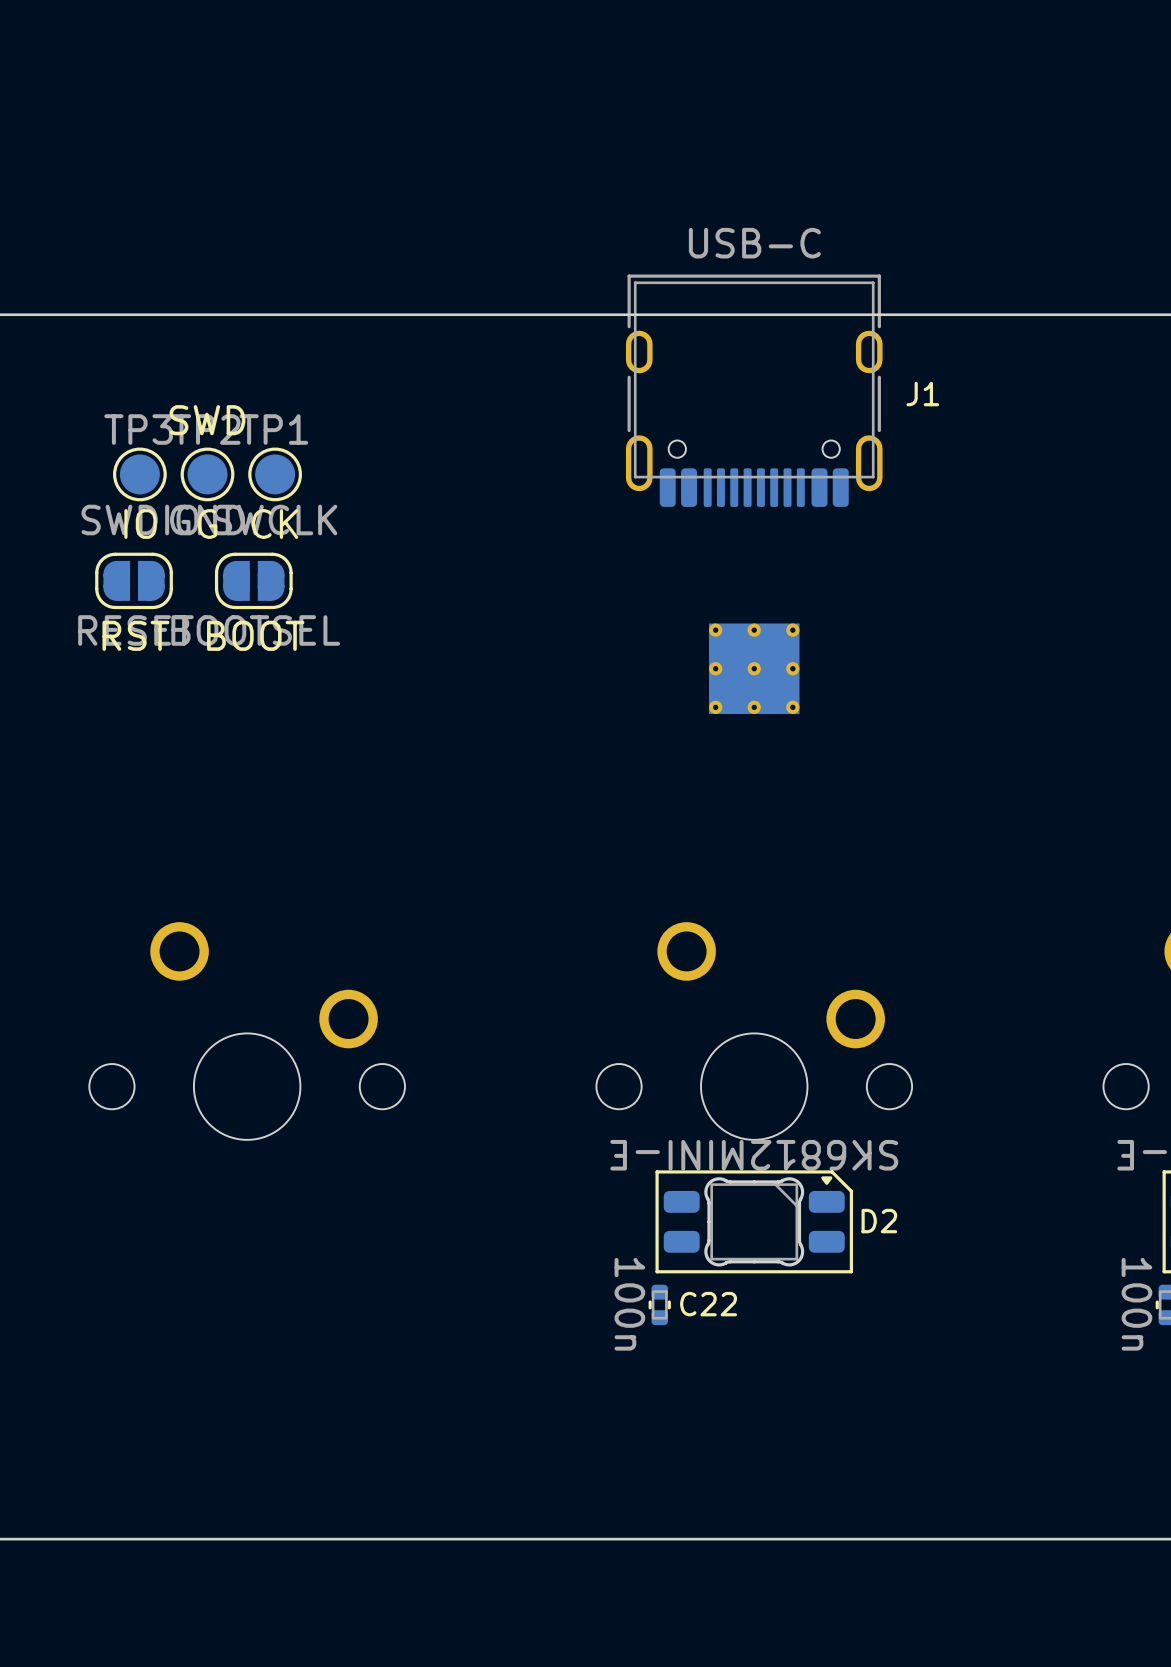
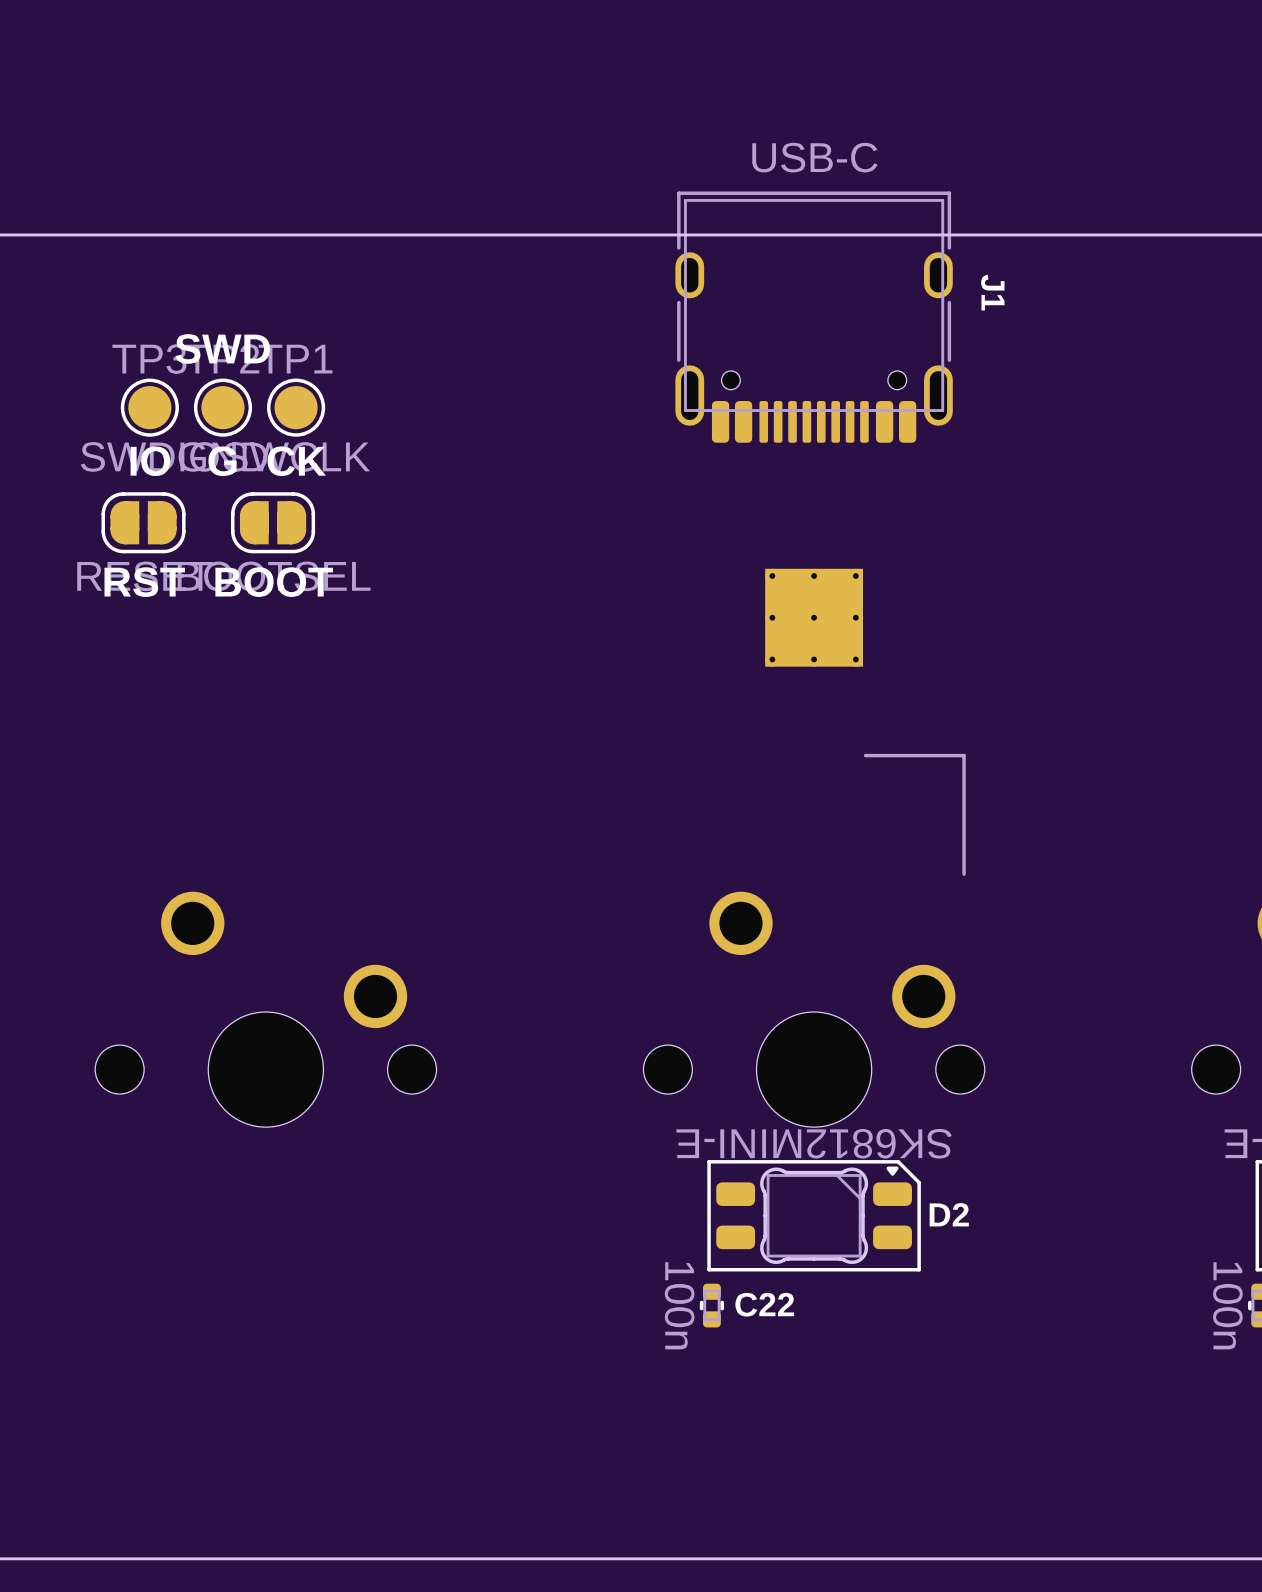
J1 name rotation: 0° (922, 394) -> 90° clockwise (992, 292)
part: none -> (914, 814)

